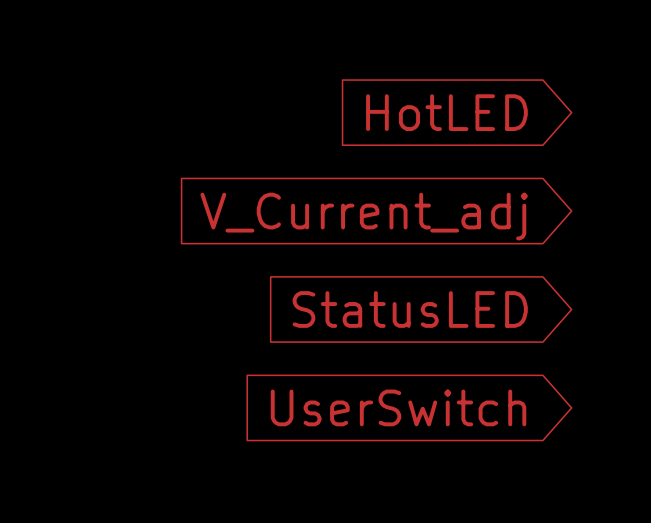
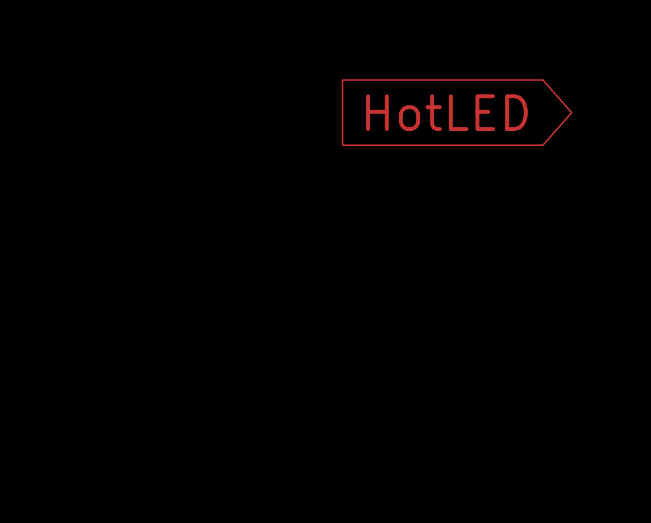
global label: V_Current_adj (364, 216) -> none
global label: StatusLED (410, 309) -> none
global label: UserSwitch (398, 407) -> none

